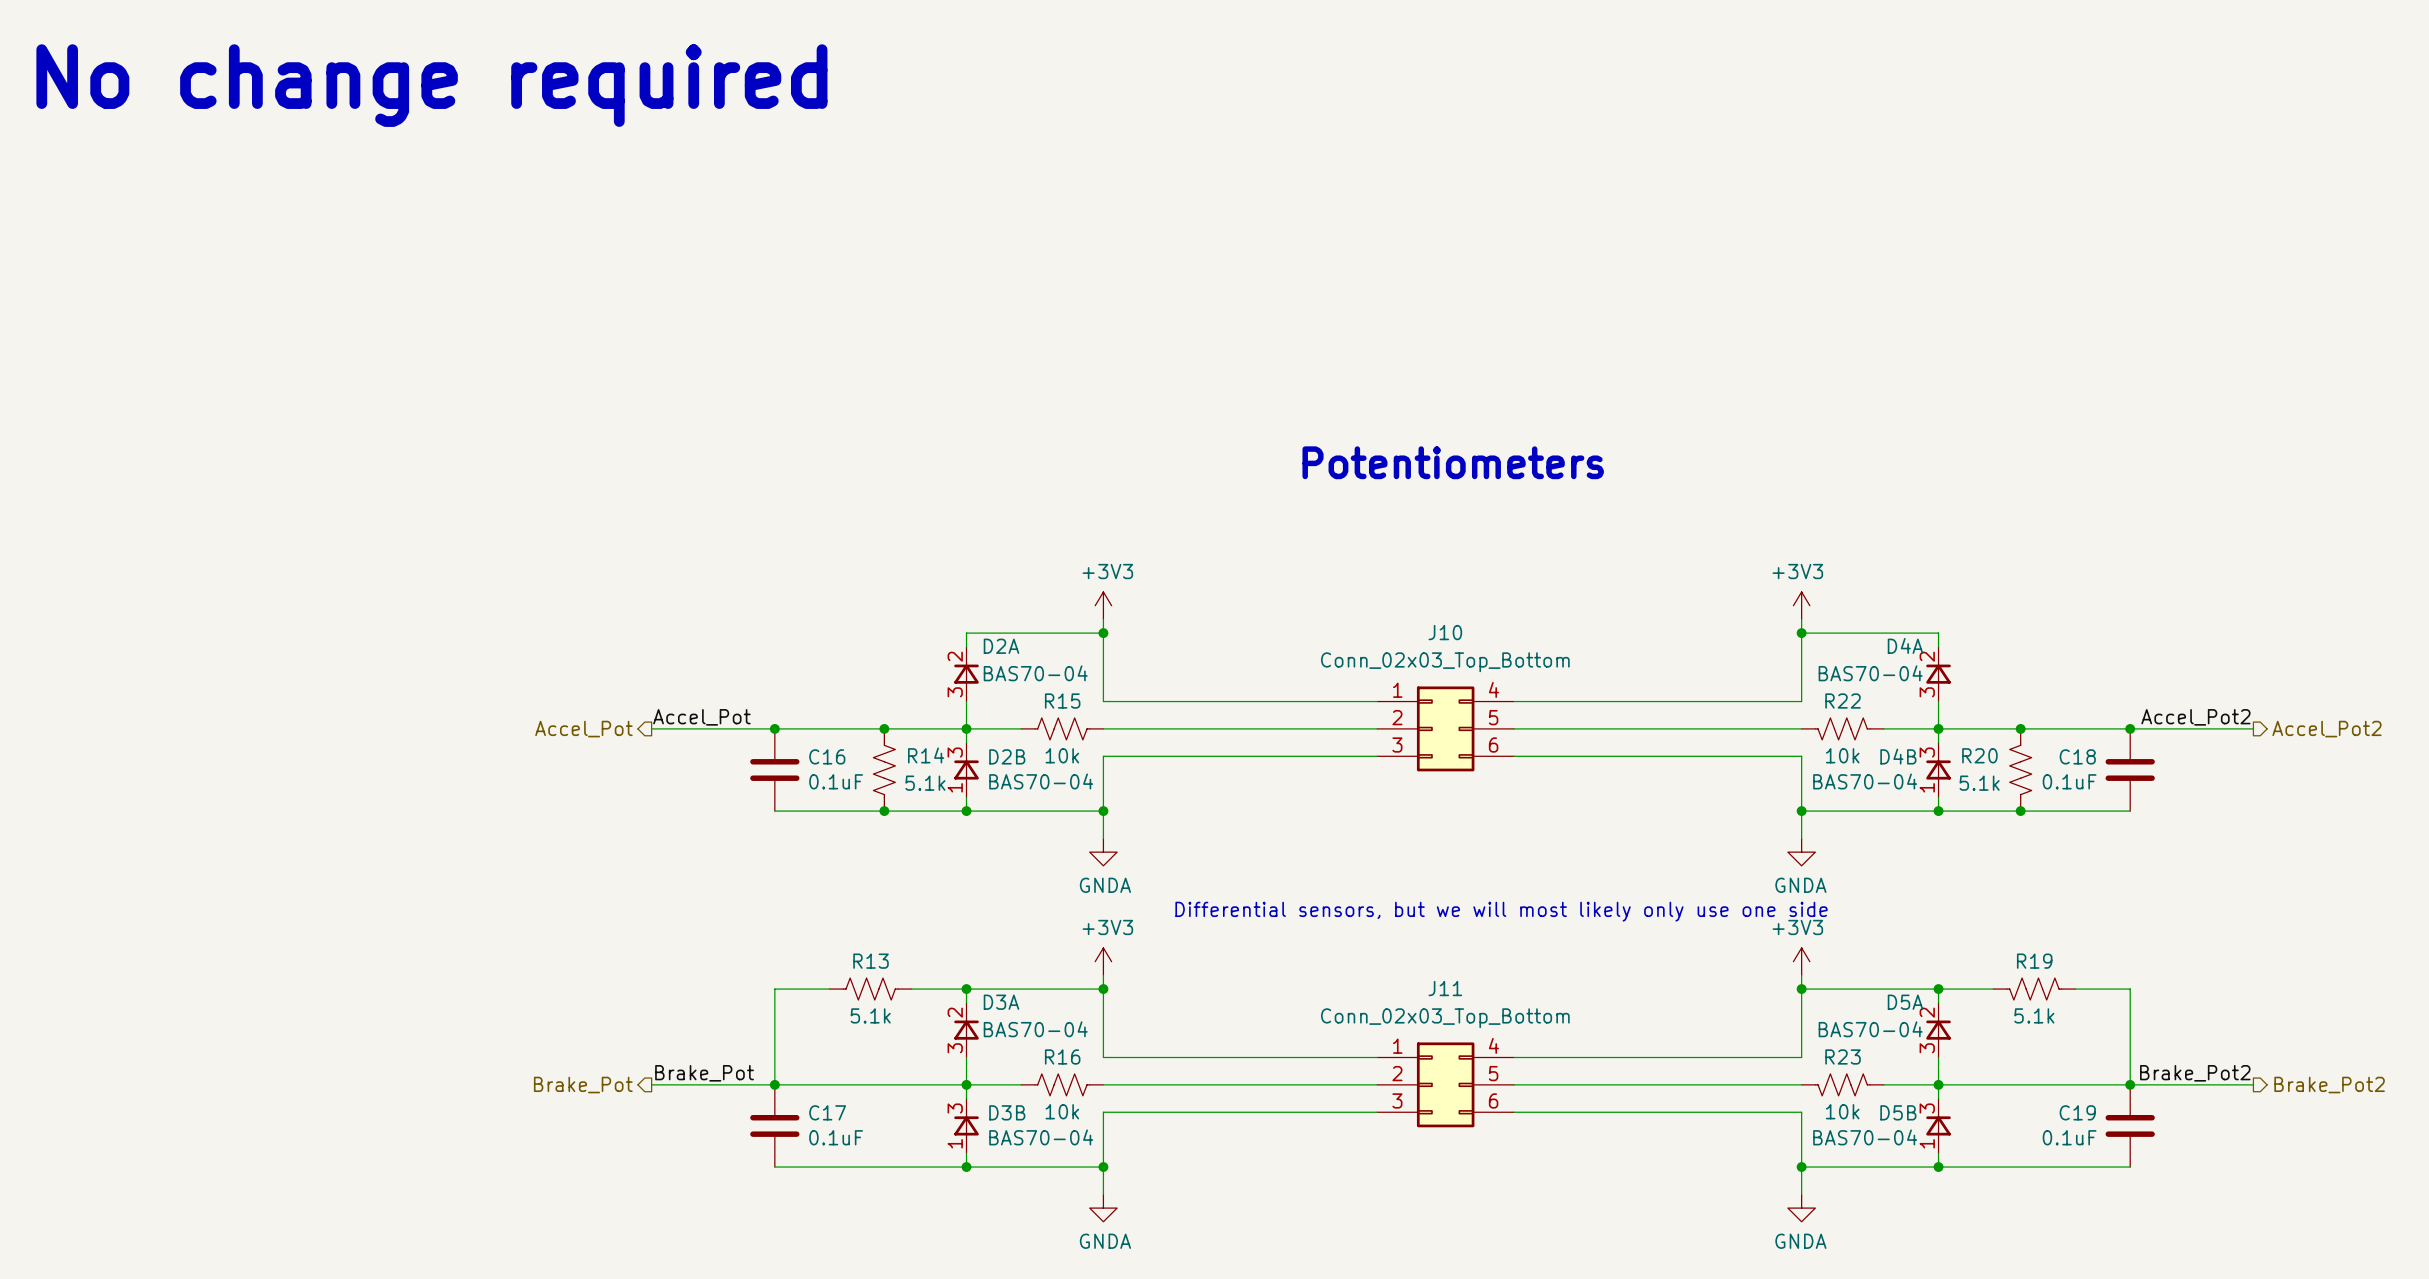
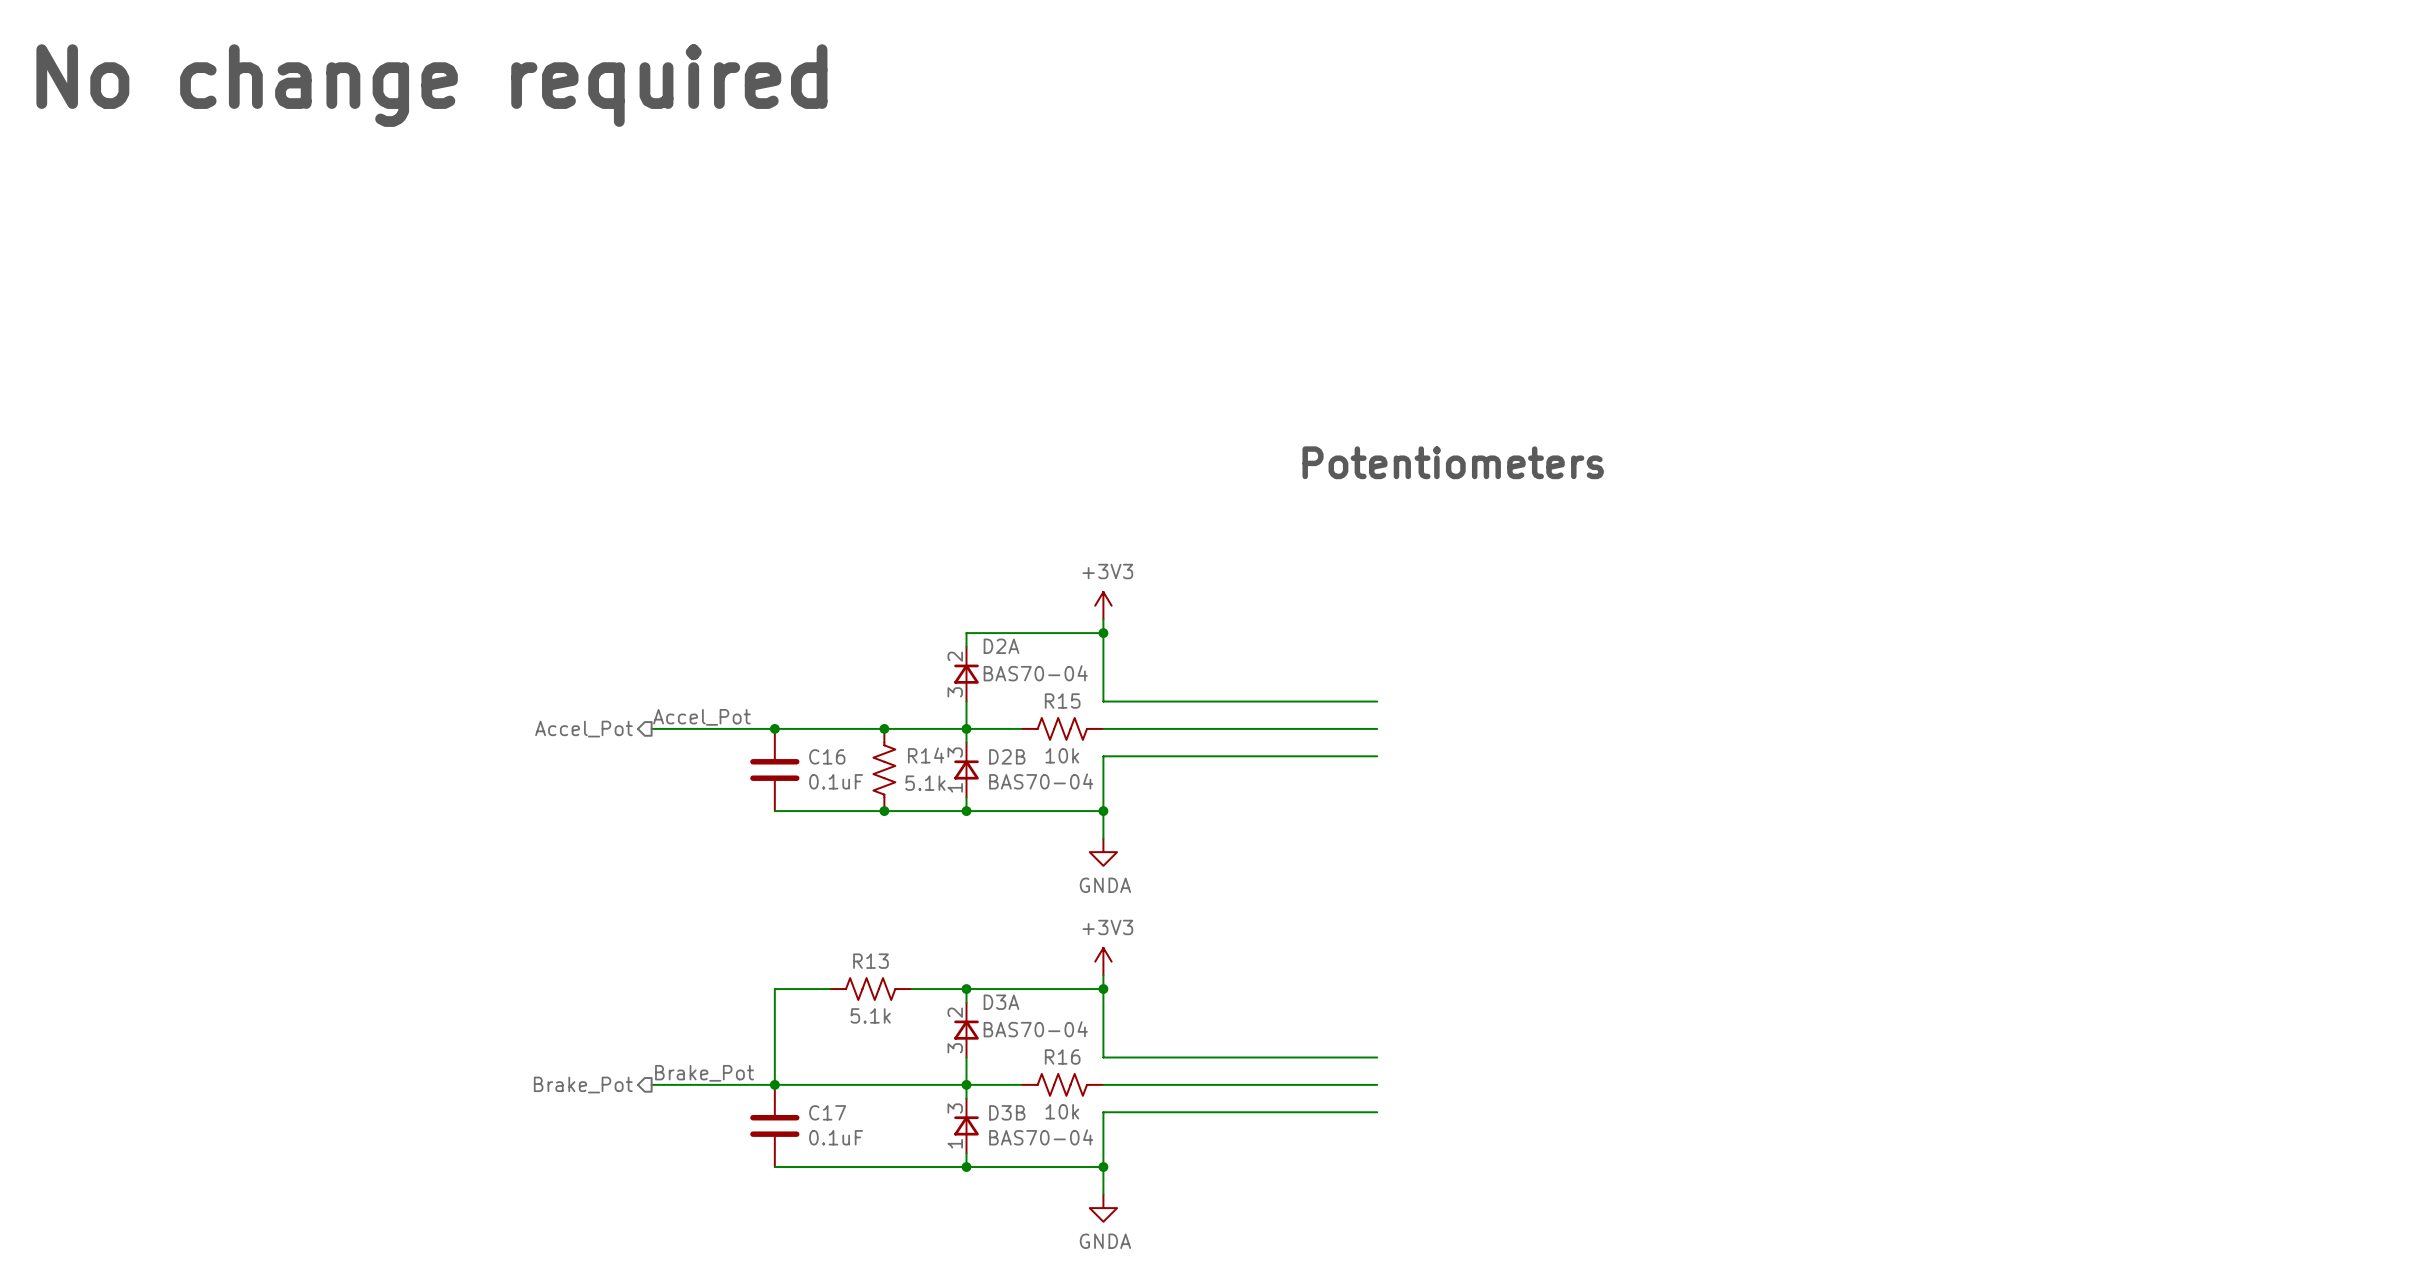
power symbol: +3V3 (1801, 605) -> none
wire: (1801, 619) (1801, 701) (1514, 701) -> none
wire: (1801, 633) (1938, 633) (1938, 646) -> none
junction: (1801, 633) -> none
D4A: BAS70-04 (1938, 674) -> none
wire: (1938, 701) (1938, 742) -> none
label: Accel_Pot2 (2195, 717) -> none
J10: Conn_02x03_Top_Bottom (1445, 728) -> none
wire: (1514, 728) (1801, 728) -> none
R22: 10k (1842, 728) -> none
wire: (1883, 728) (2253, 728) -> none
junction: (1938, 728) -> none
junction: (2020, 728) -> none
junction: (2130, 728) -> none
hierarchical label: Accel_Pot2 (2326, 729) -> none
wire: (1514, 756) (1801, 756) (1801, 838) -> none
D4B: BAS70-04 (1938, 769) -> none
R20: 5.1k (2020, 769) -> none
C18: 0.1uF (2130, 769) -> none
wire: (1938, 797) (1938, 811) -> none
wire: (1801, 811) (2130, 811) -> none
junction: (1801, 811) -> none
junction: (1938, 811) -> none
junction: (2020, 811) -> none
power symbol: GNDA (1801, 852) -> none
text: Differential sensors, but we will most likely only use one side (1501, 911) -> none
power symbol: +3V3 (1801, 961) -> none
wire: (1801, 975) (1801, 1057) (1514, 1057) -> none
wire: (1801, 989) (1993, 989) -> none
junction: (1801, 989) -> none
wire: (1938, 989) (1938, 1002) -> none
junction: (1938, 989) -> none
R19: 5.1k (2034, 989) -> none
wire: (2075, 989) (2130, 989) (2130, 1084) -> none
D5A: BAS70-04 (1938, 1030) -> none
wire: (1938, 1057) (1938, 1098) -> none
label: Brake_Pot2 (2195, 1073) -> none
J11: Conn_02x03_Top_Bottom (1445, 1084) -> none
wire: (1514, 1084) (1801, 1084) -> none
R23: 10k (1842, 1084) -> none
wire: (1883, 1084) (2253, 1084) -> none
junction: (1938, 1084) -> none
junction: (2130, 1084) -> none
hierarchical label: Brake_Pot2 (2329, 1085) -> none
wire: (1514, 1112) (1801, 1112) (1801, 1194) -> none
D5B: BAS70-04 (1938, 1125) -> none
C19: 0.1uF (2130, 1125) -> none
wire: (1938, 1153) (1938, 1167) -> none
wire: (1801, 1167) (2130, 1167) -> none
junction: (1801, 1167) -> none
junction: (1938, 1167) -> none
power symbol: GNDA (1801, 1208) -> none

